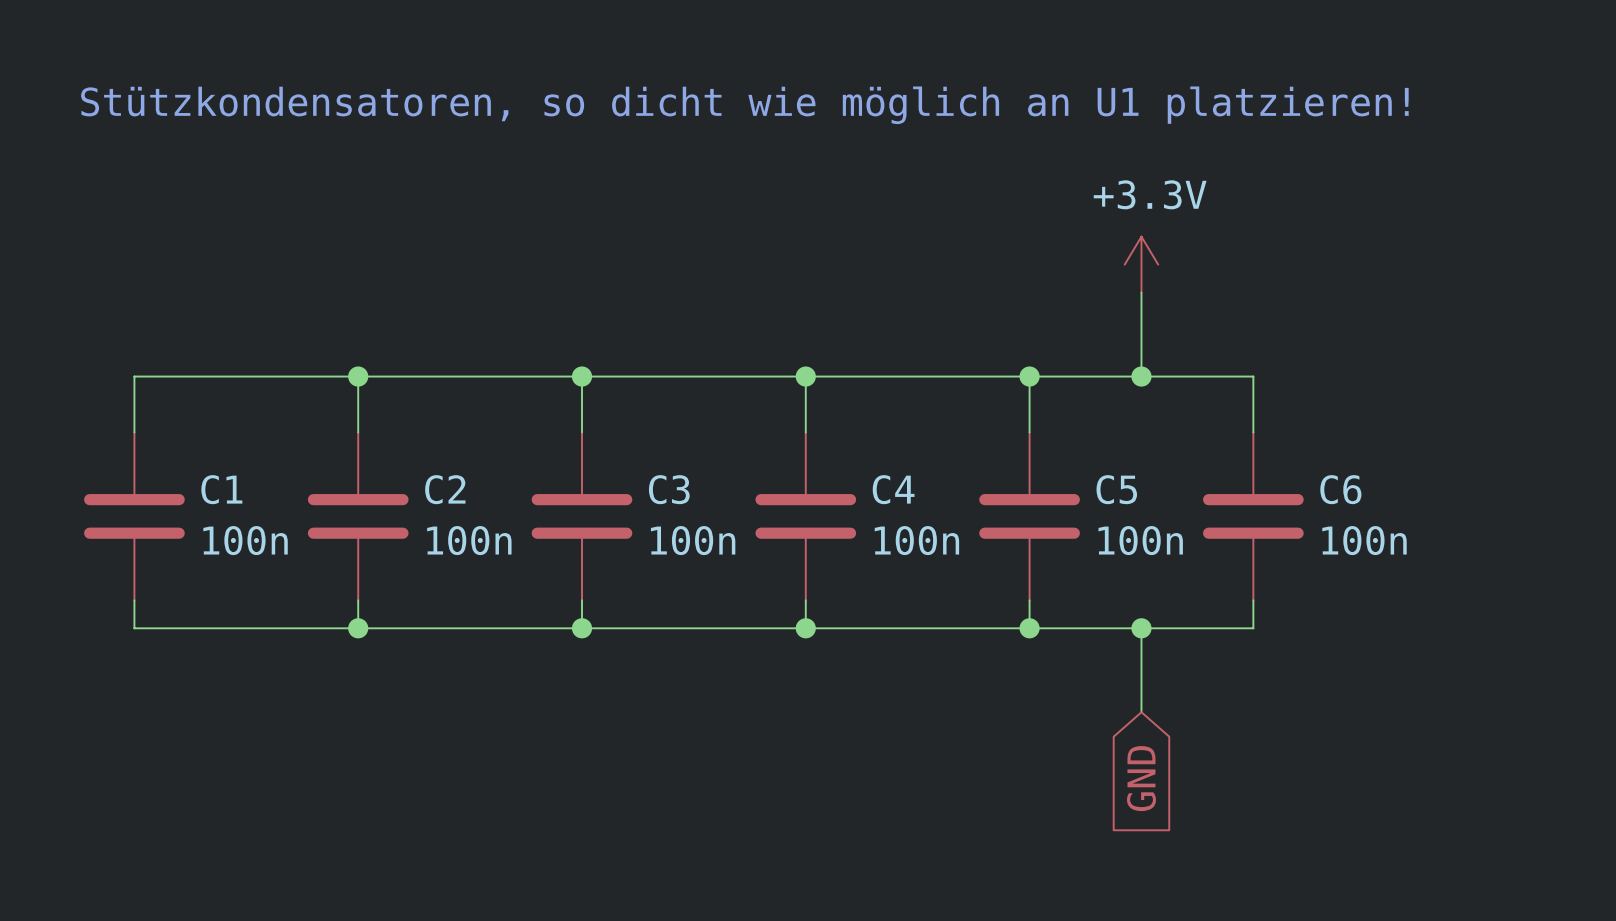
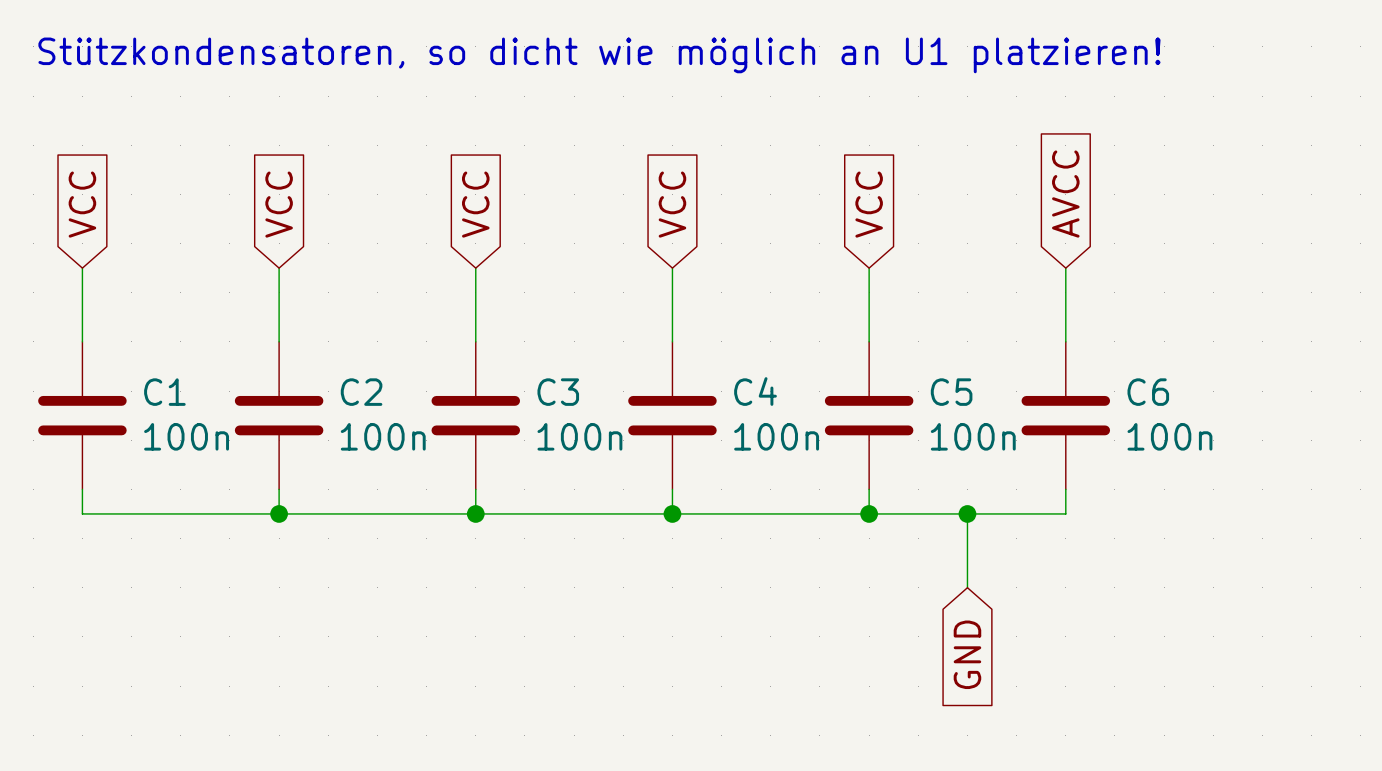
power symbol: +3.3V (1141, 264) -> none
global label: none -> AVCC (1065, 194)
global label: none -> VCC (82, 204)
global label: none -> VCC (279, 204)
global label: none -> VCC (475, 204)
global label: none -> VCC (672, 204)
global label: none -> VCC (869, 204)
wire: (1141, 292) (1141, 376) -> none
wire: none -> (279, 268) (279, 292)
wire: none -> (475, 268) (475, 292)
wire: none -> (672, 268) (672, 292)
wire: none -> (869, 268) (869, 292)
wire: none -> (1065, 268) (1065, 292)
wire: (134, 376) (1253, 376) -> (82, 292) (82, 268)
junction: (358, 376) -> none
junction: (582, 376) -> none
junction: (805, 376) -> none
junction: (1029, 376) -> none
junction: (1141, 376) -> none

